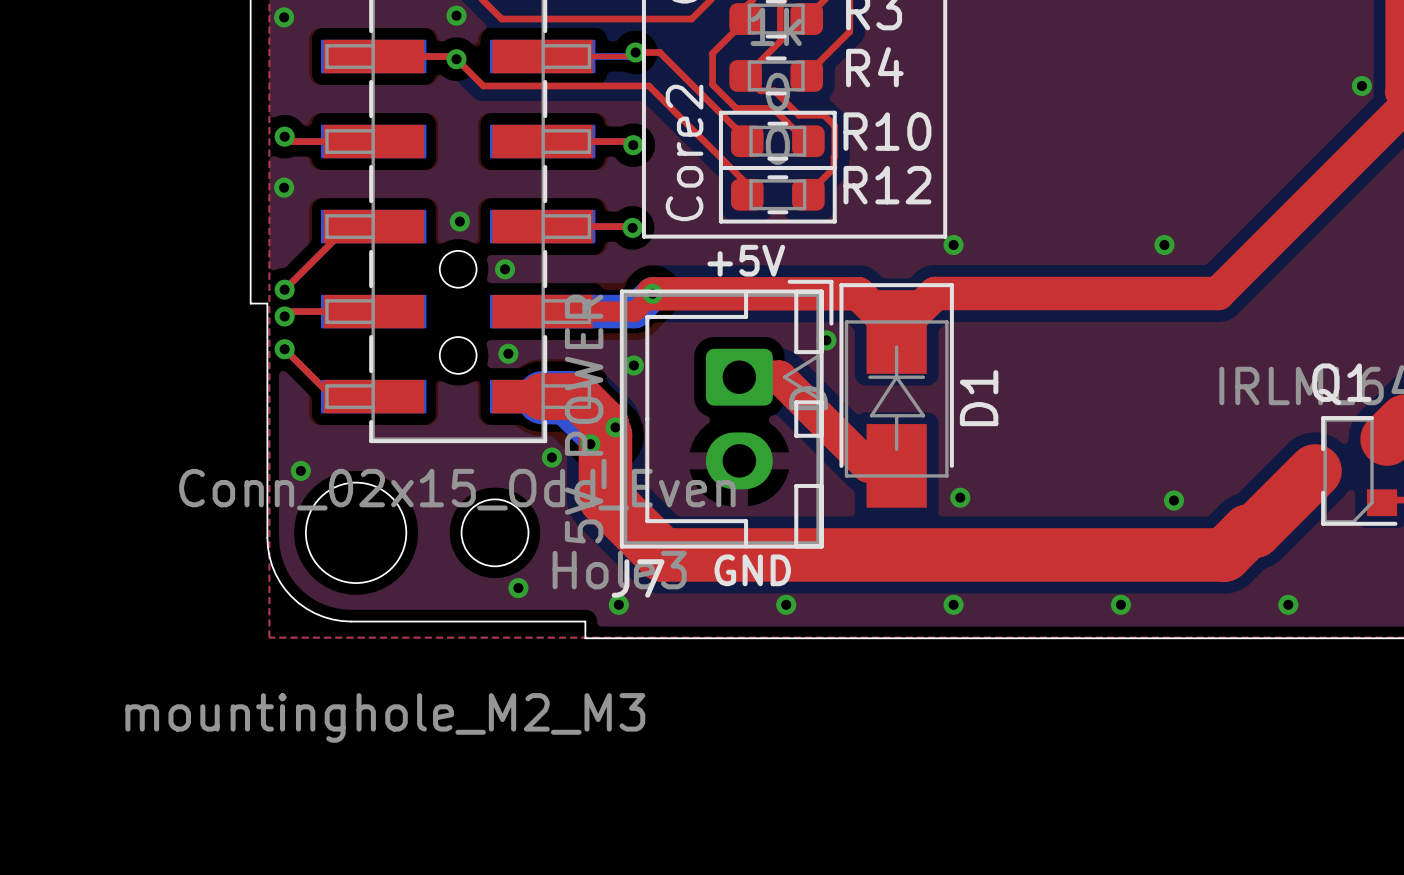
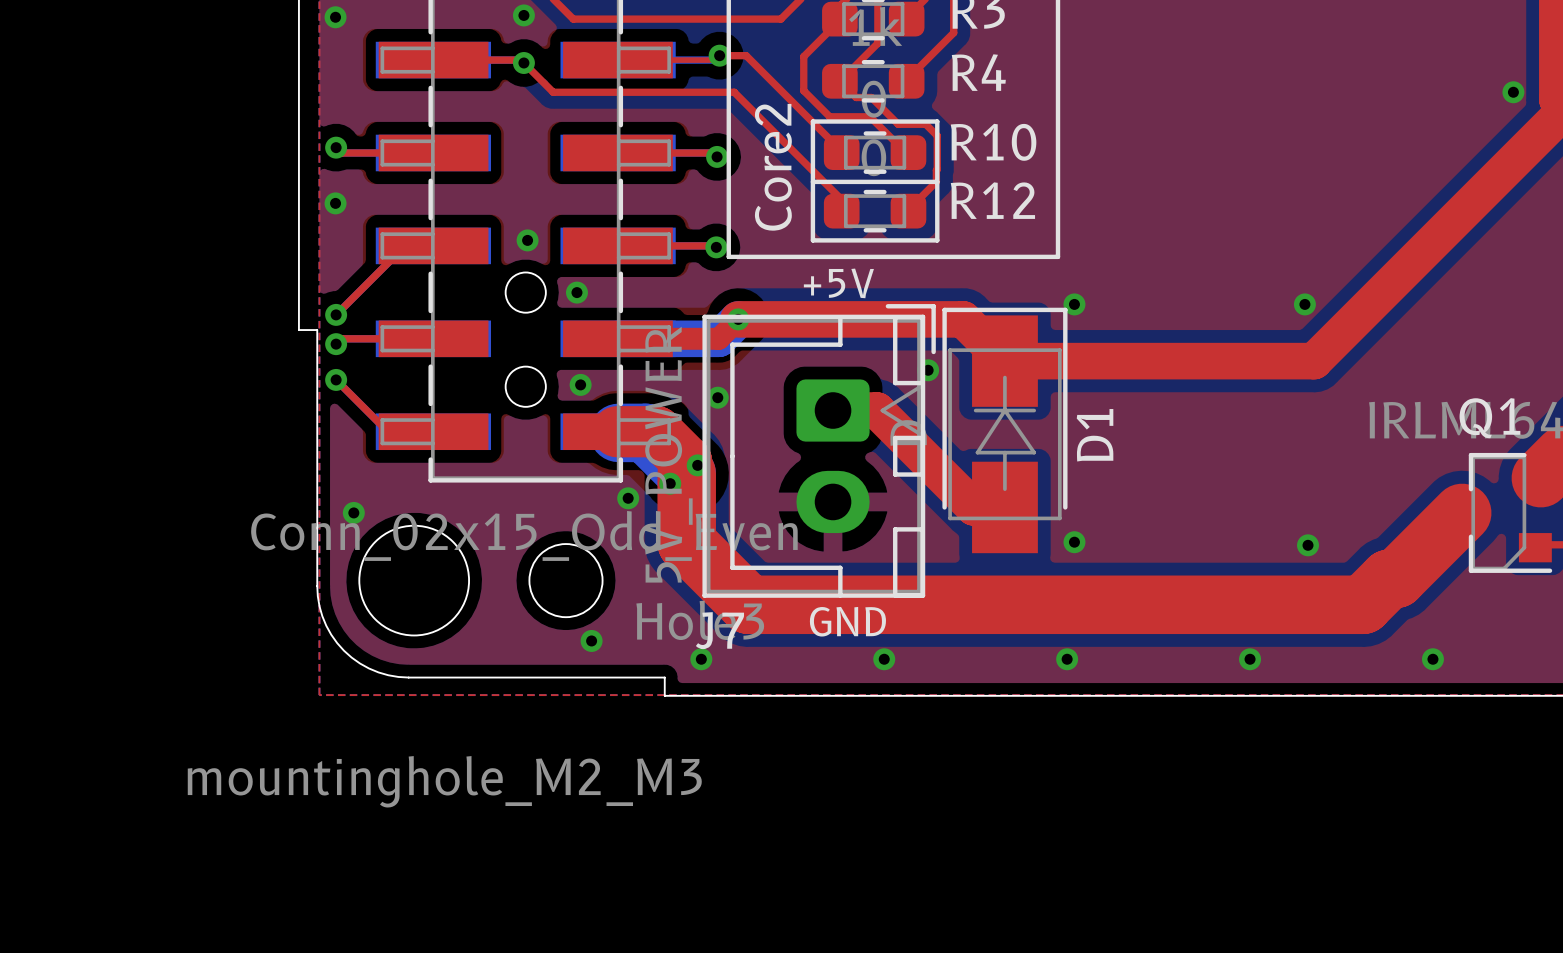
via position: (953, 244) -> (1074, 304)
via position: (1164, 244) -> (1304, 304)
top track: (1218, 293) (935, 293) (896, 332) -> (1356, 319) (1314, 361) (1004, 361)

